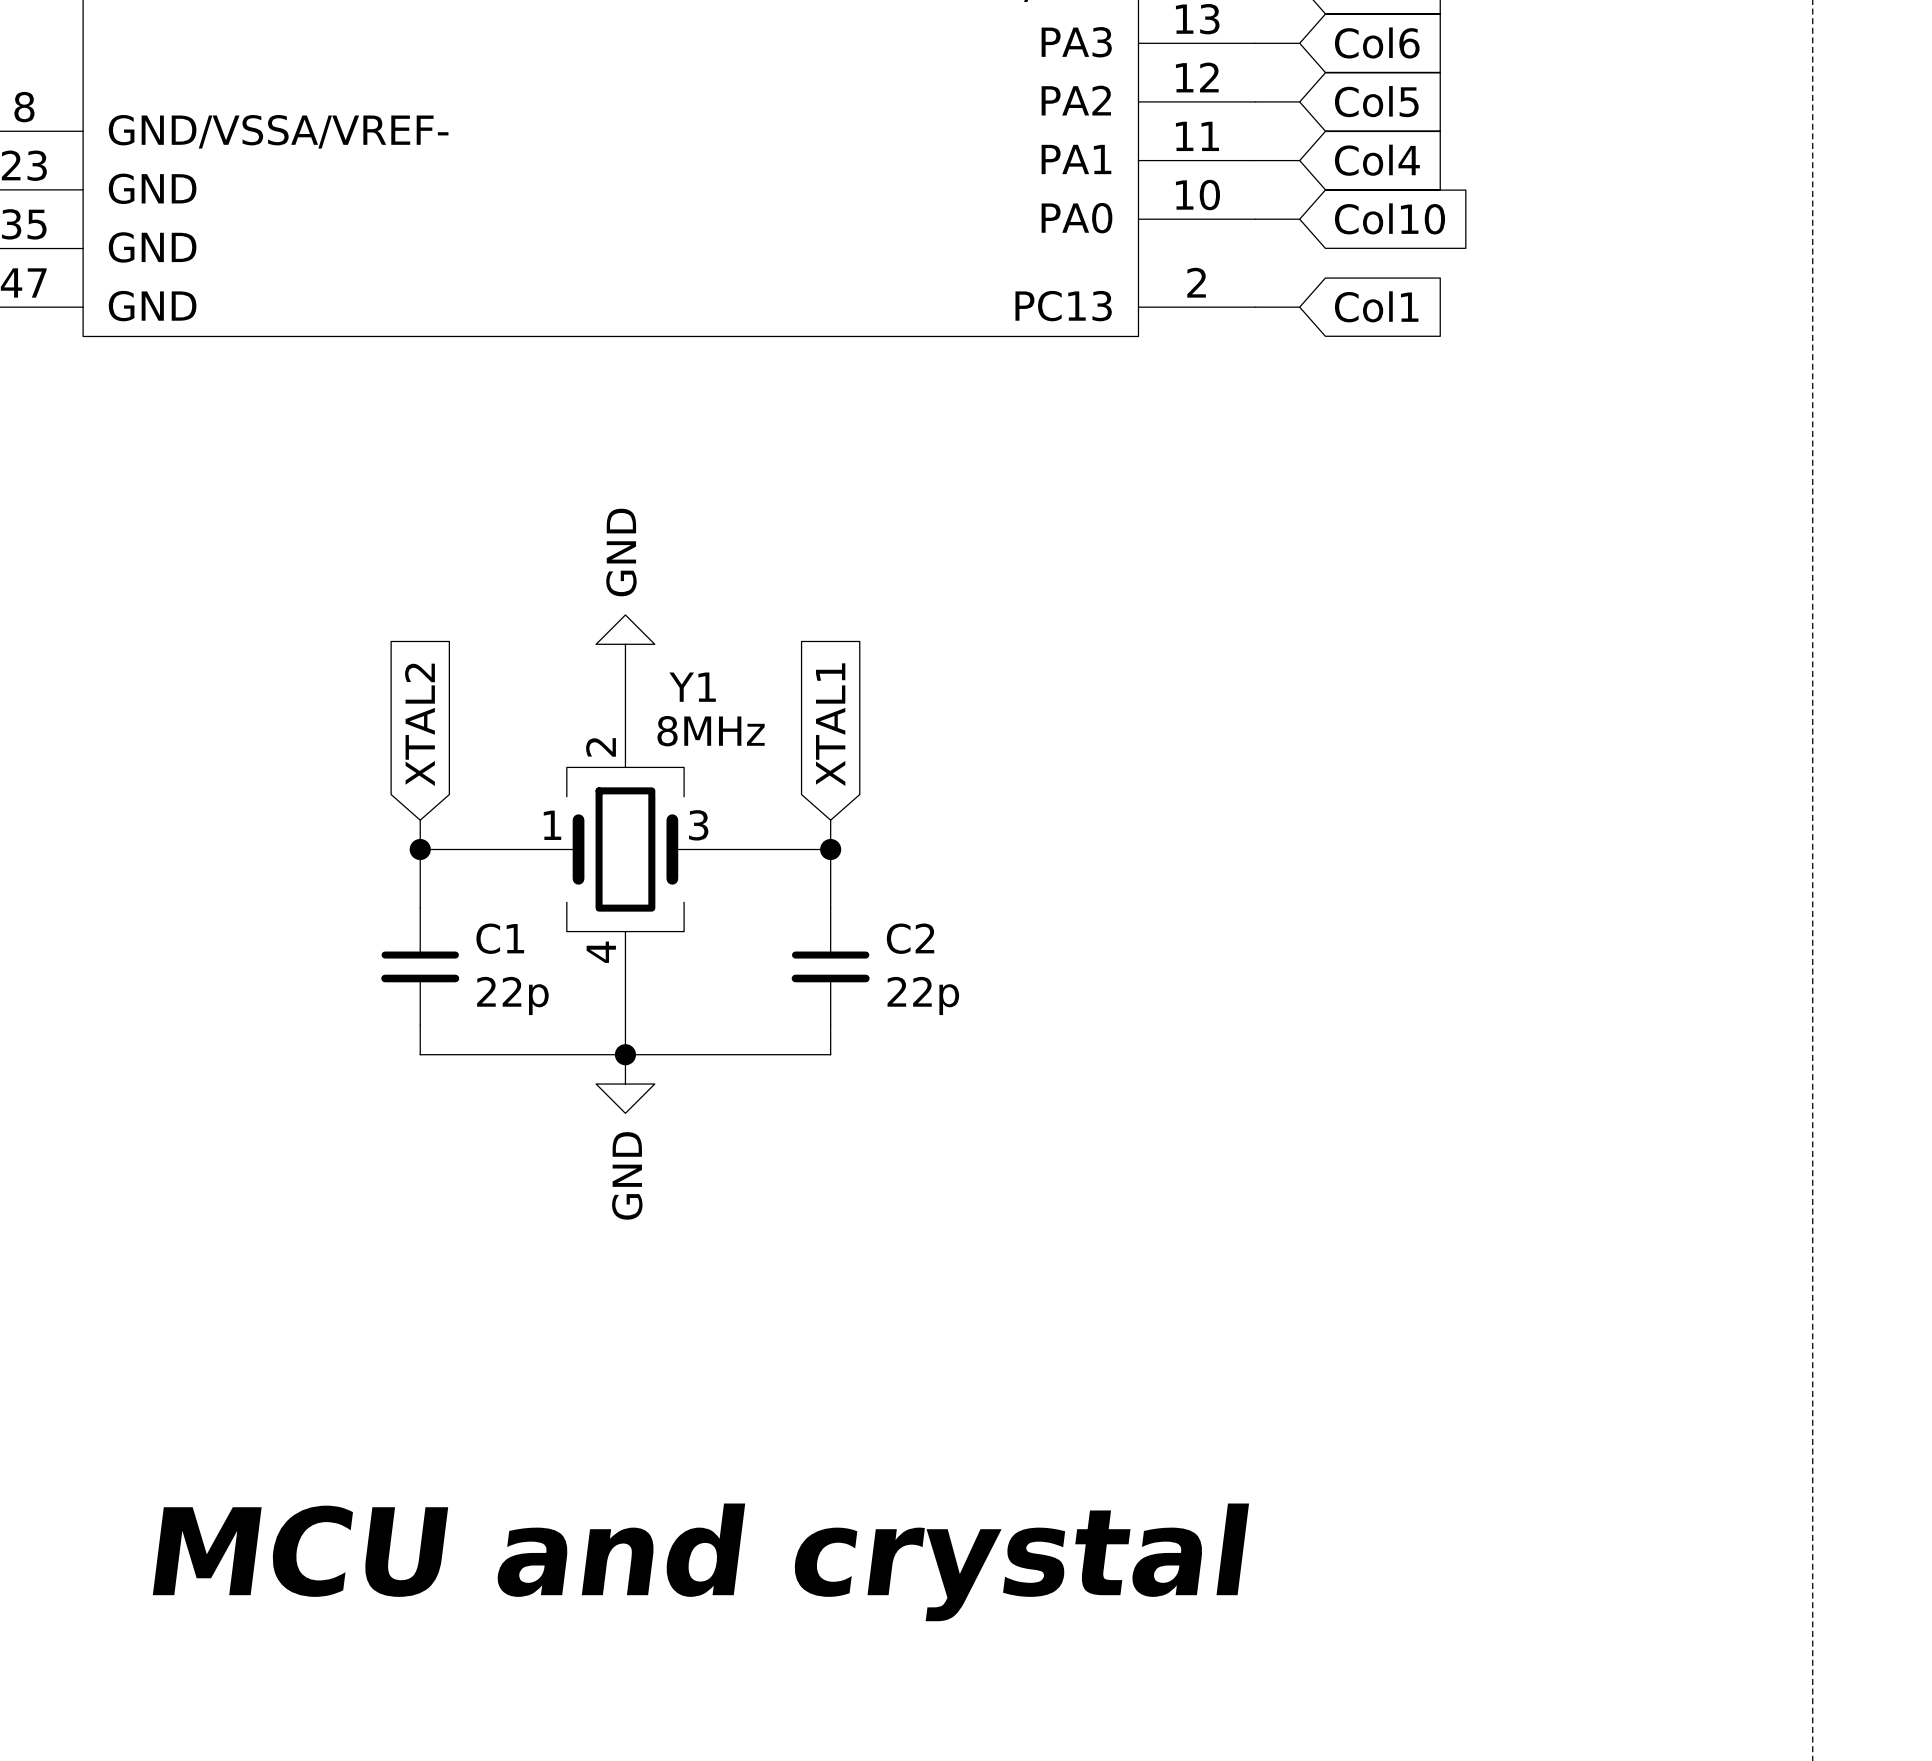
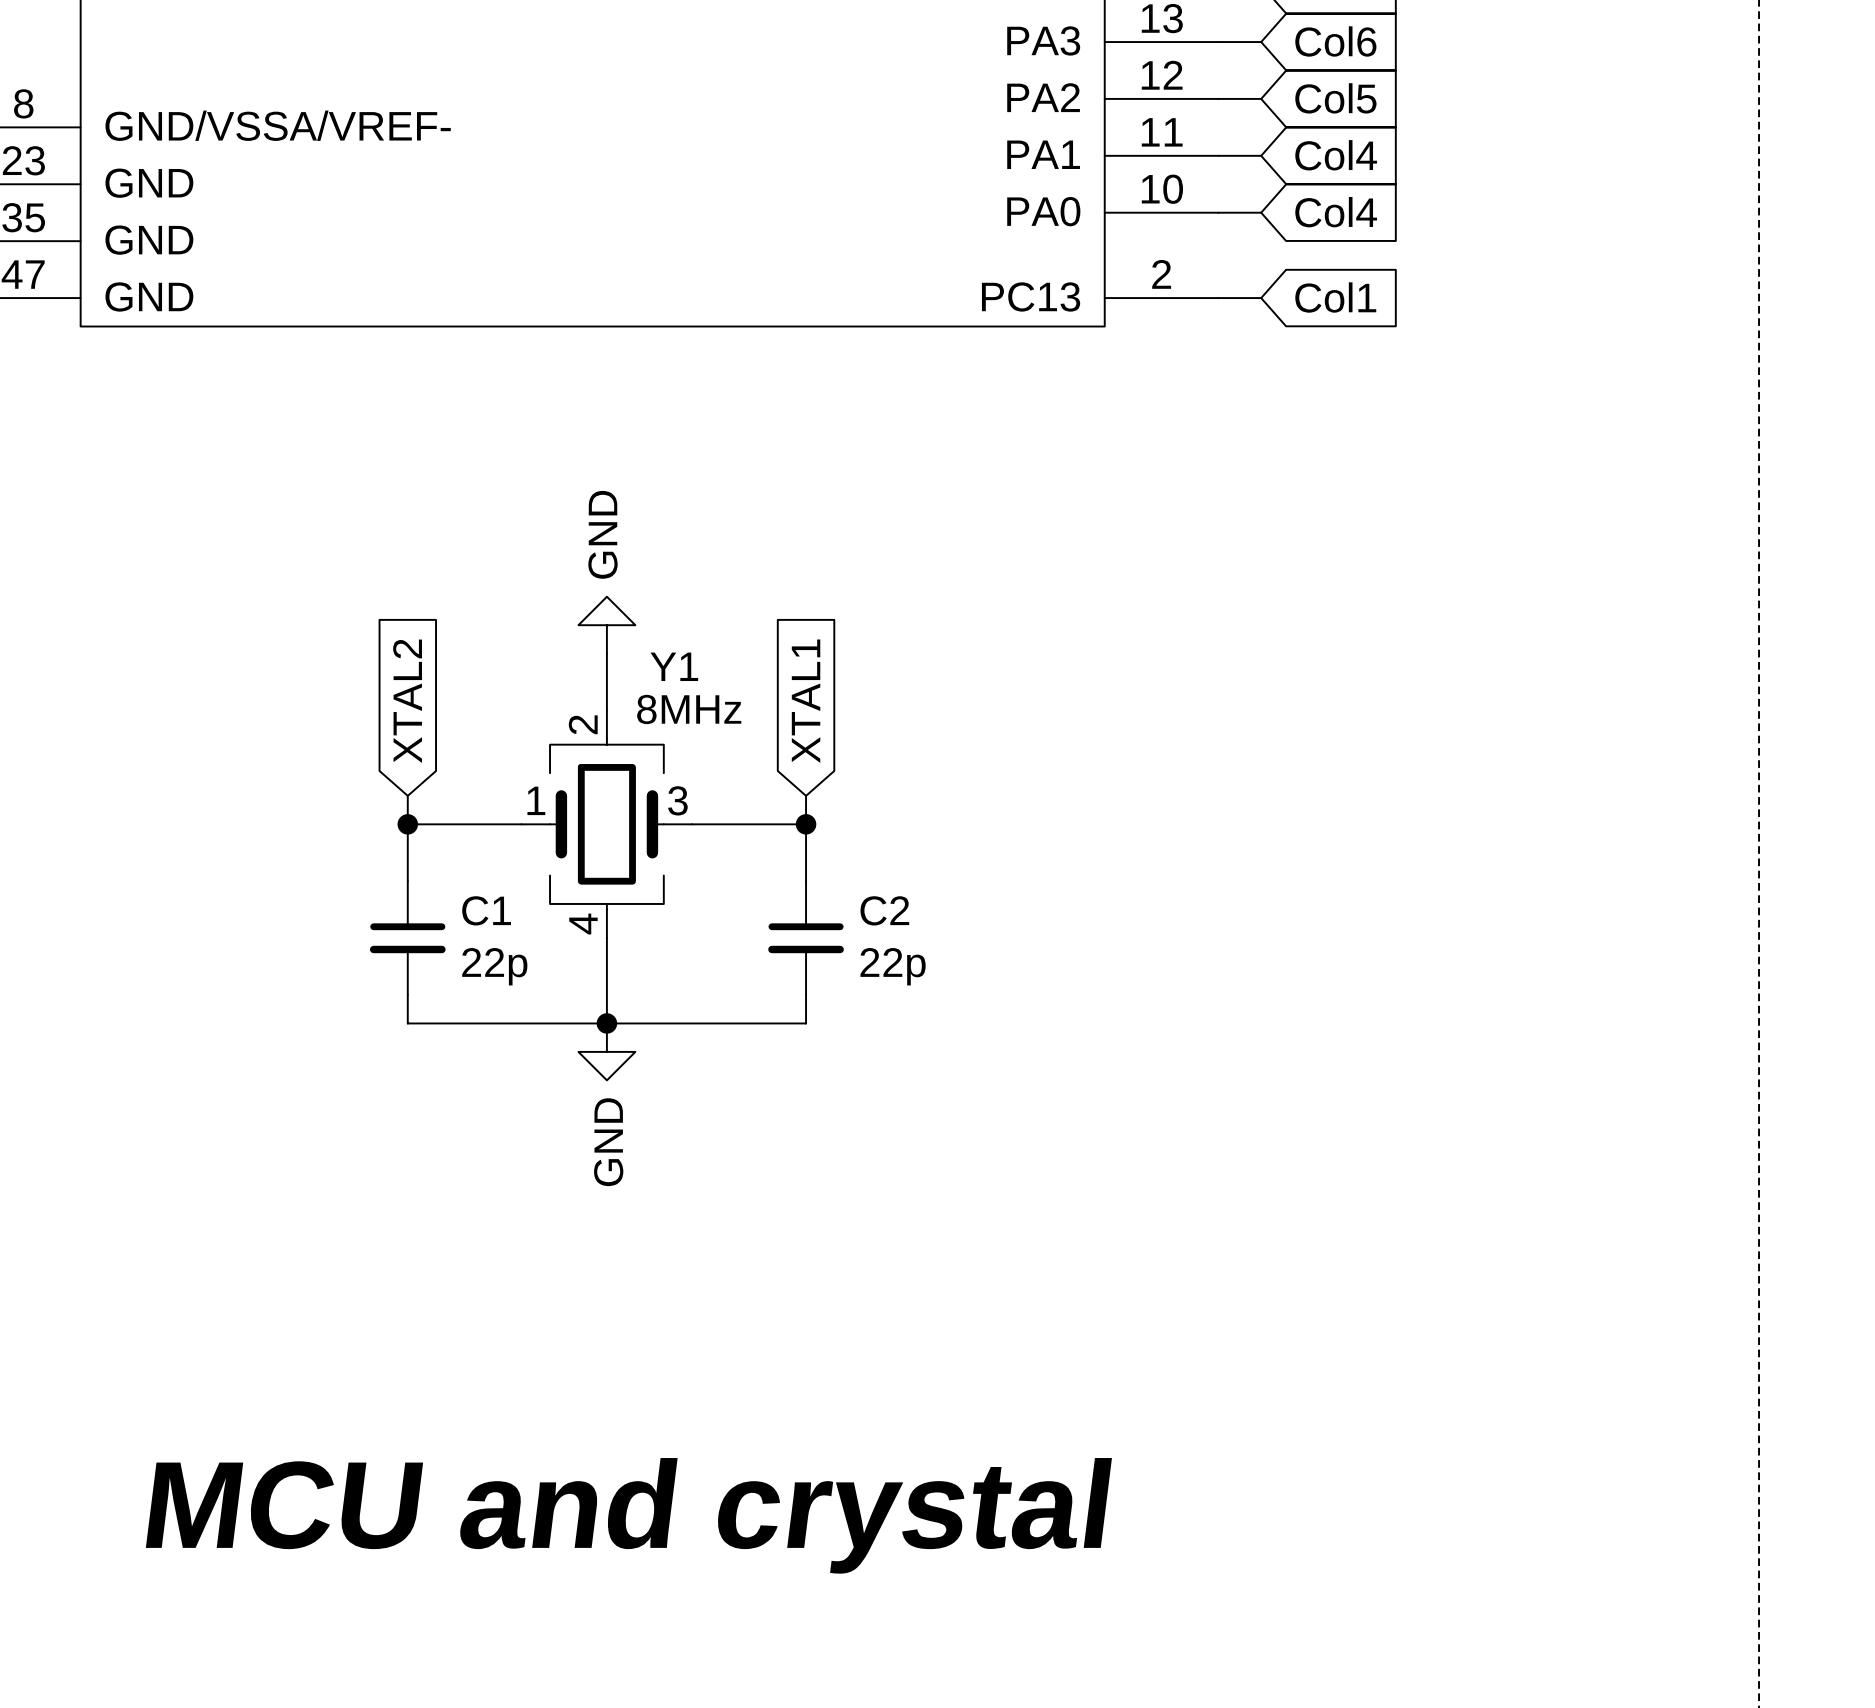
global label: Col10 (1389, 218) -> Col4 (1336, 212)

